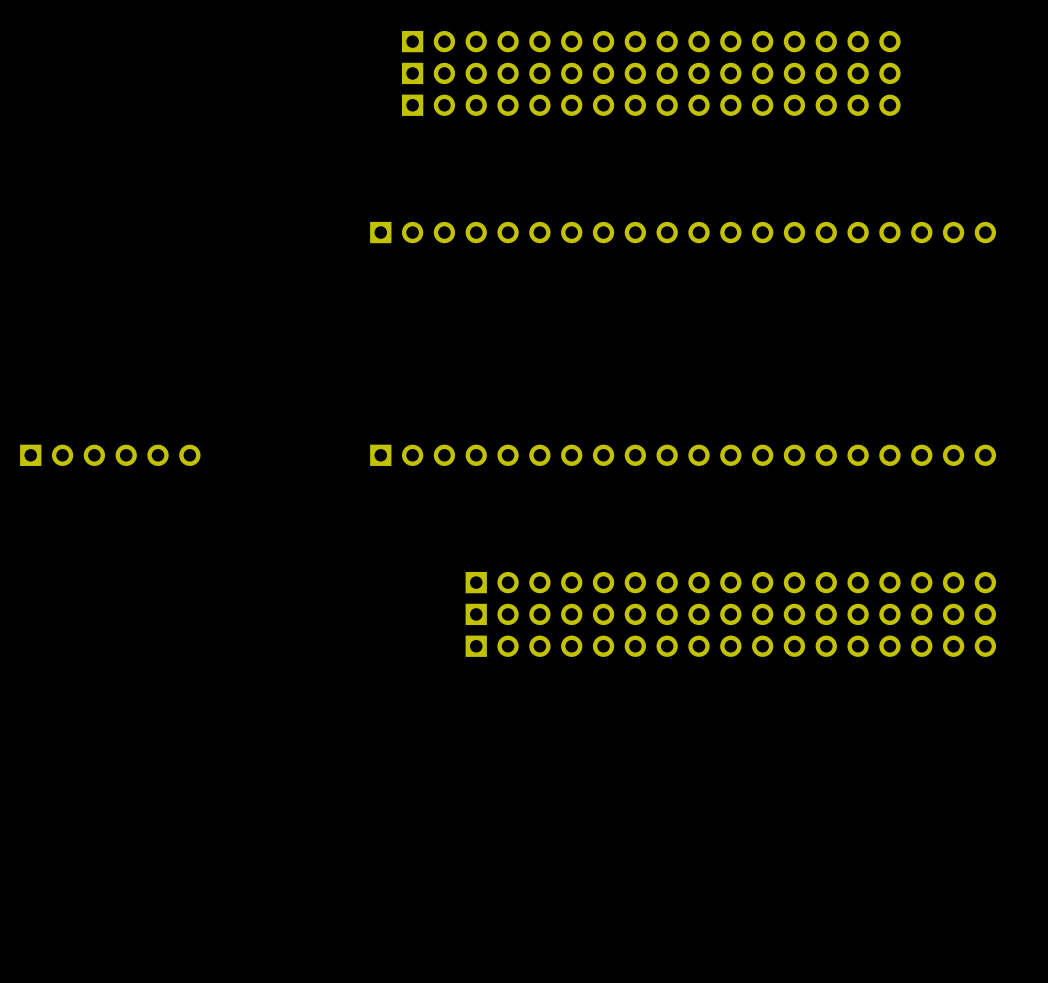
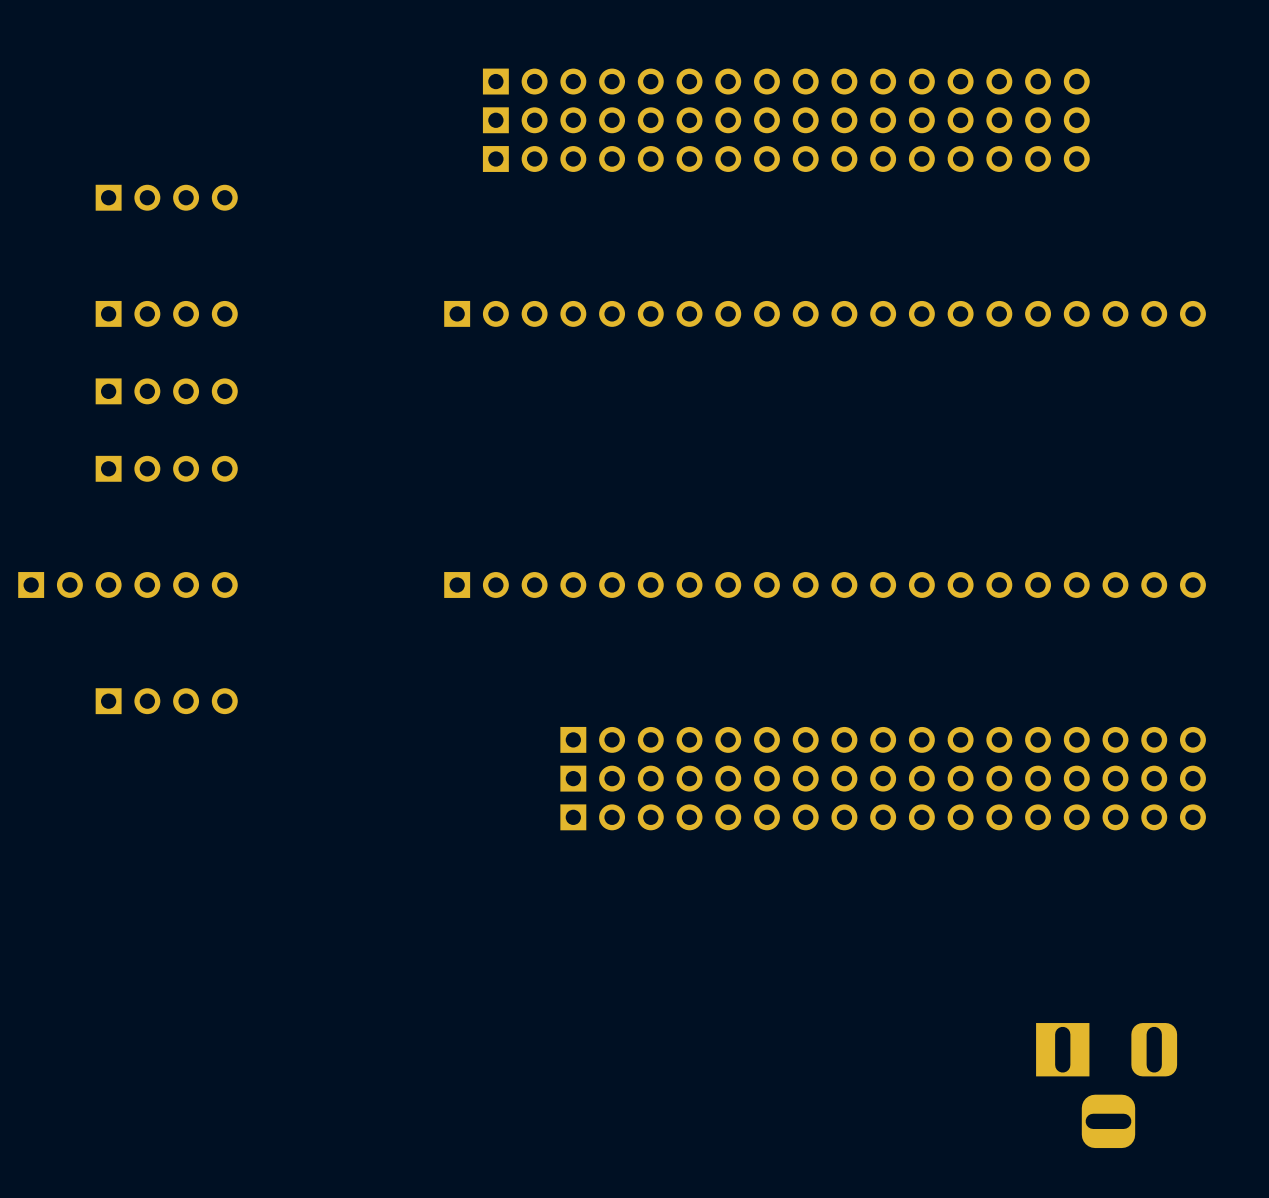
part: none -> (166, 197)
part: none -> (166, 313)
part: none -> (166, 391)
part: none -> (166, 468)
part: none -> (166, 701)
part: none -> (1106, 1085)

